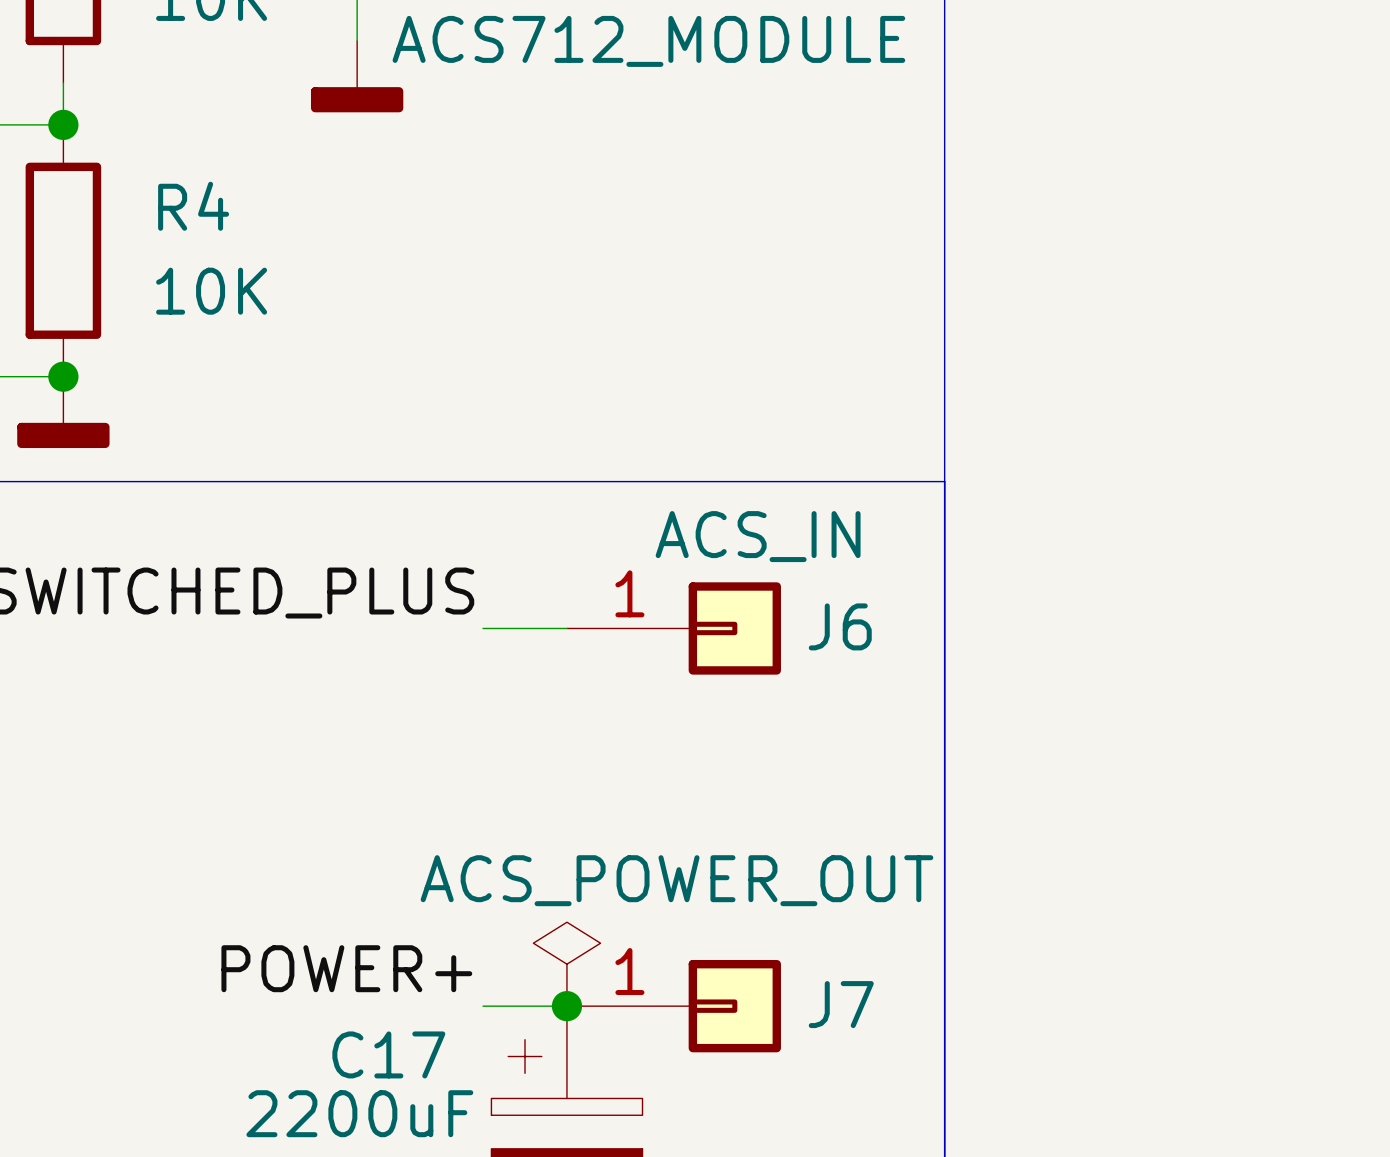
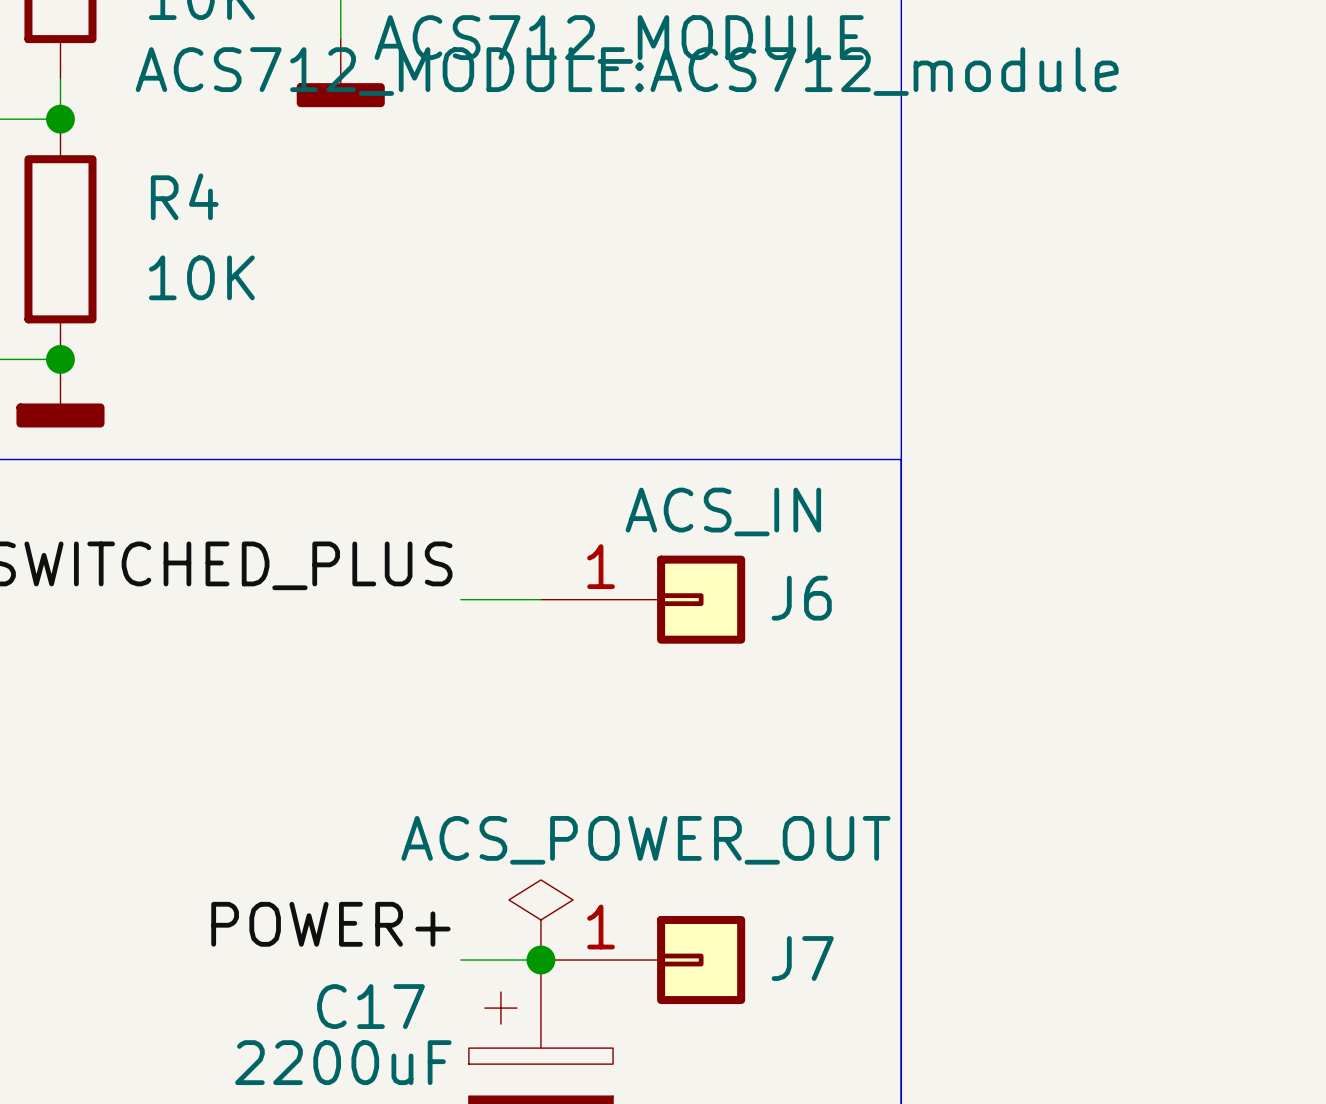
part text: none -> ACS712_MODULE:ACS712_module (627, 71)

